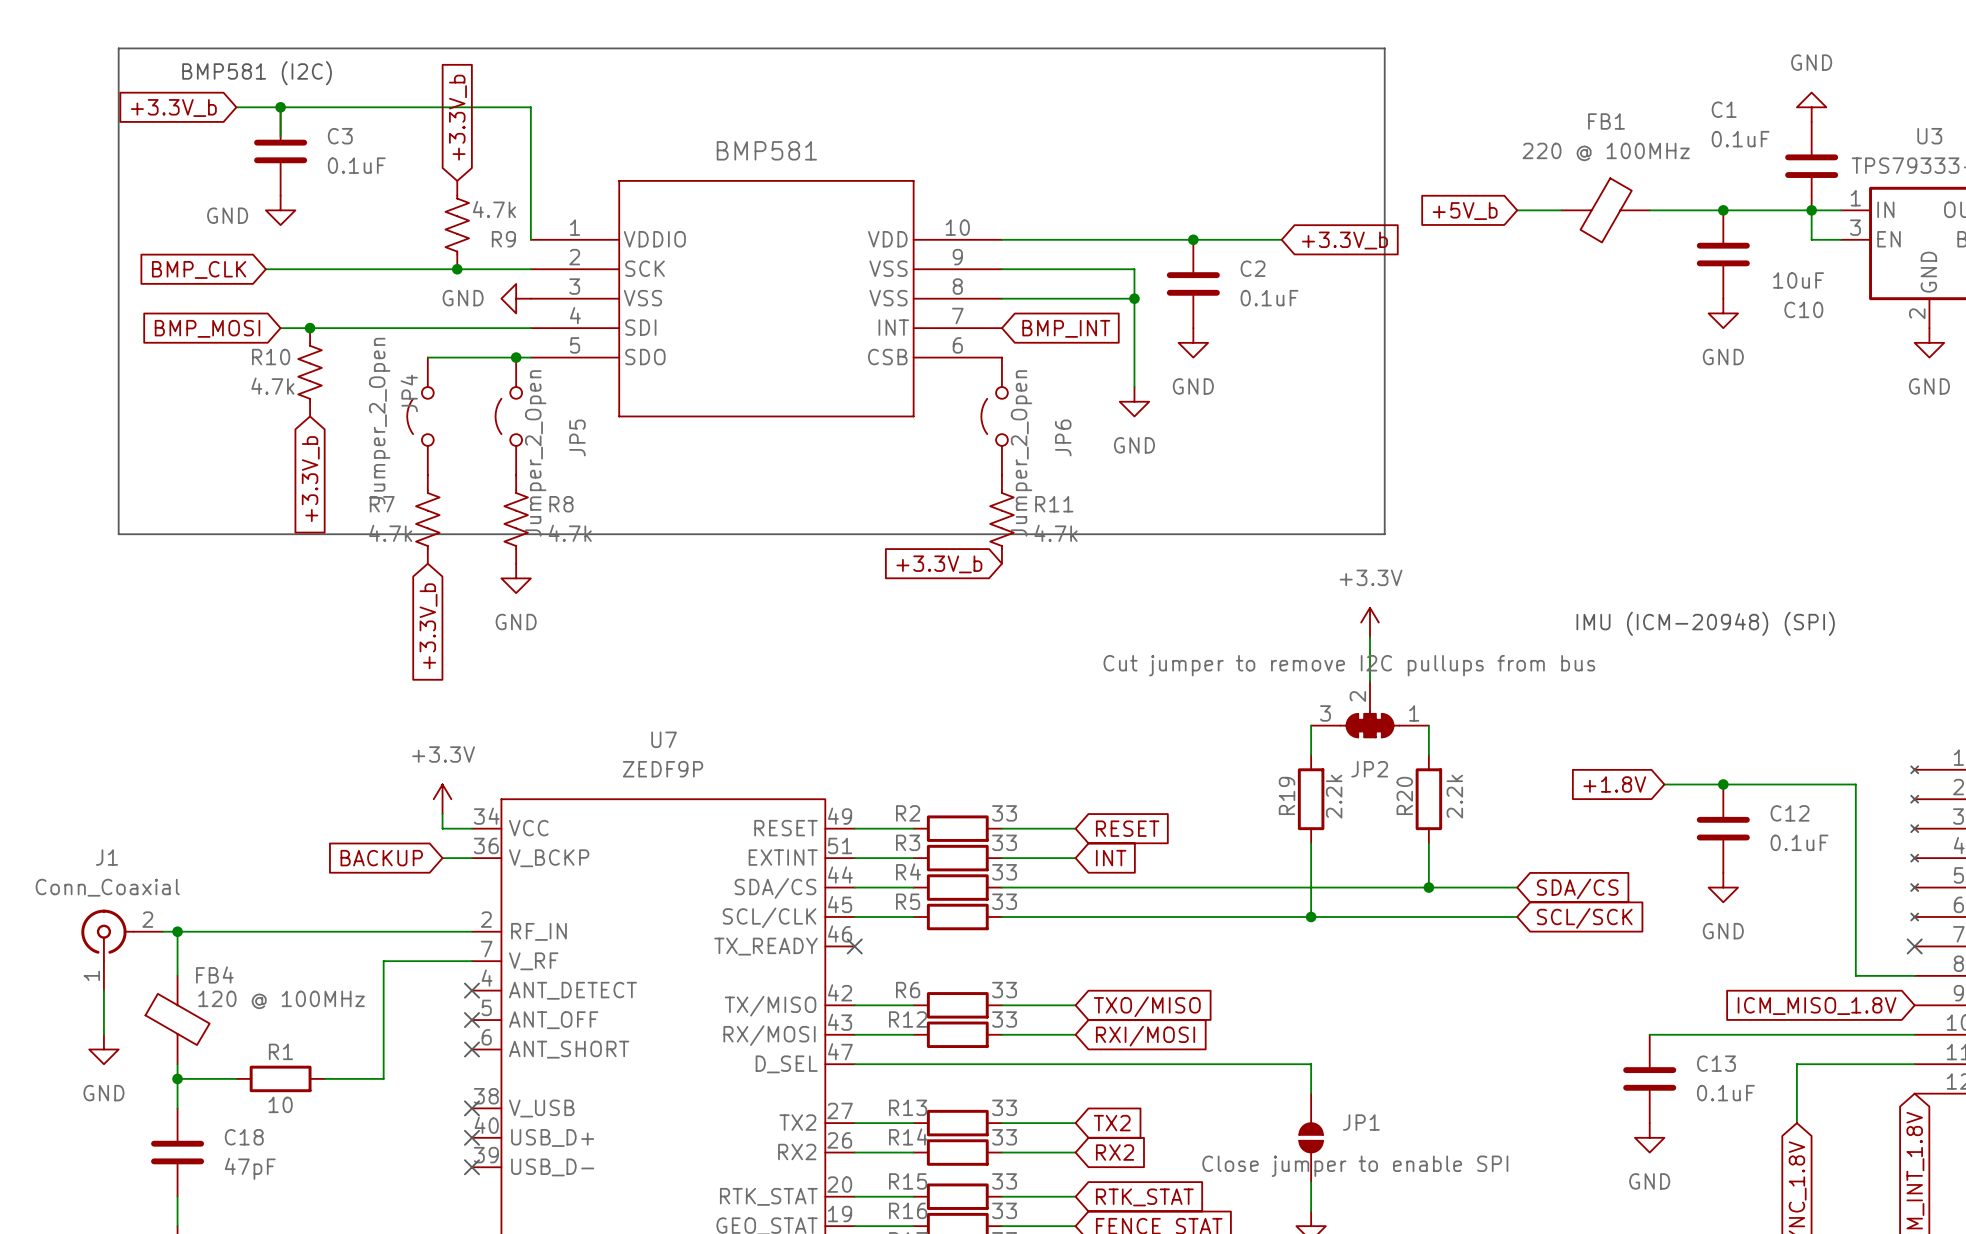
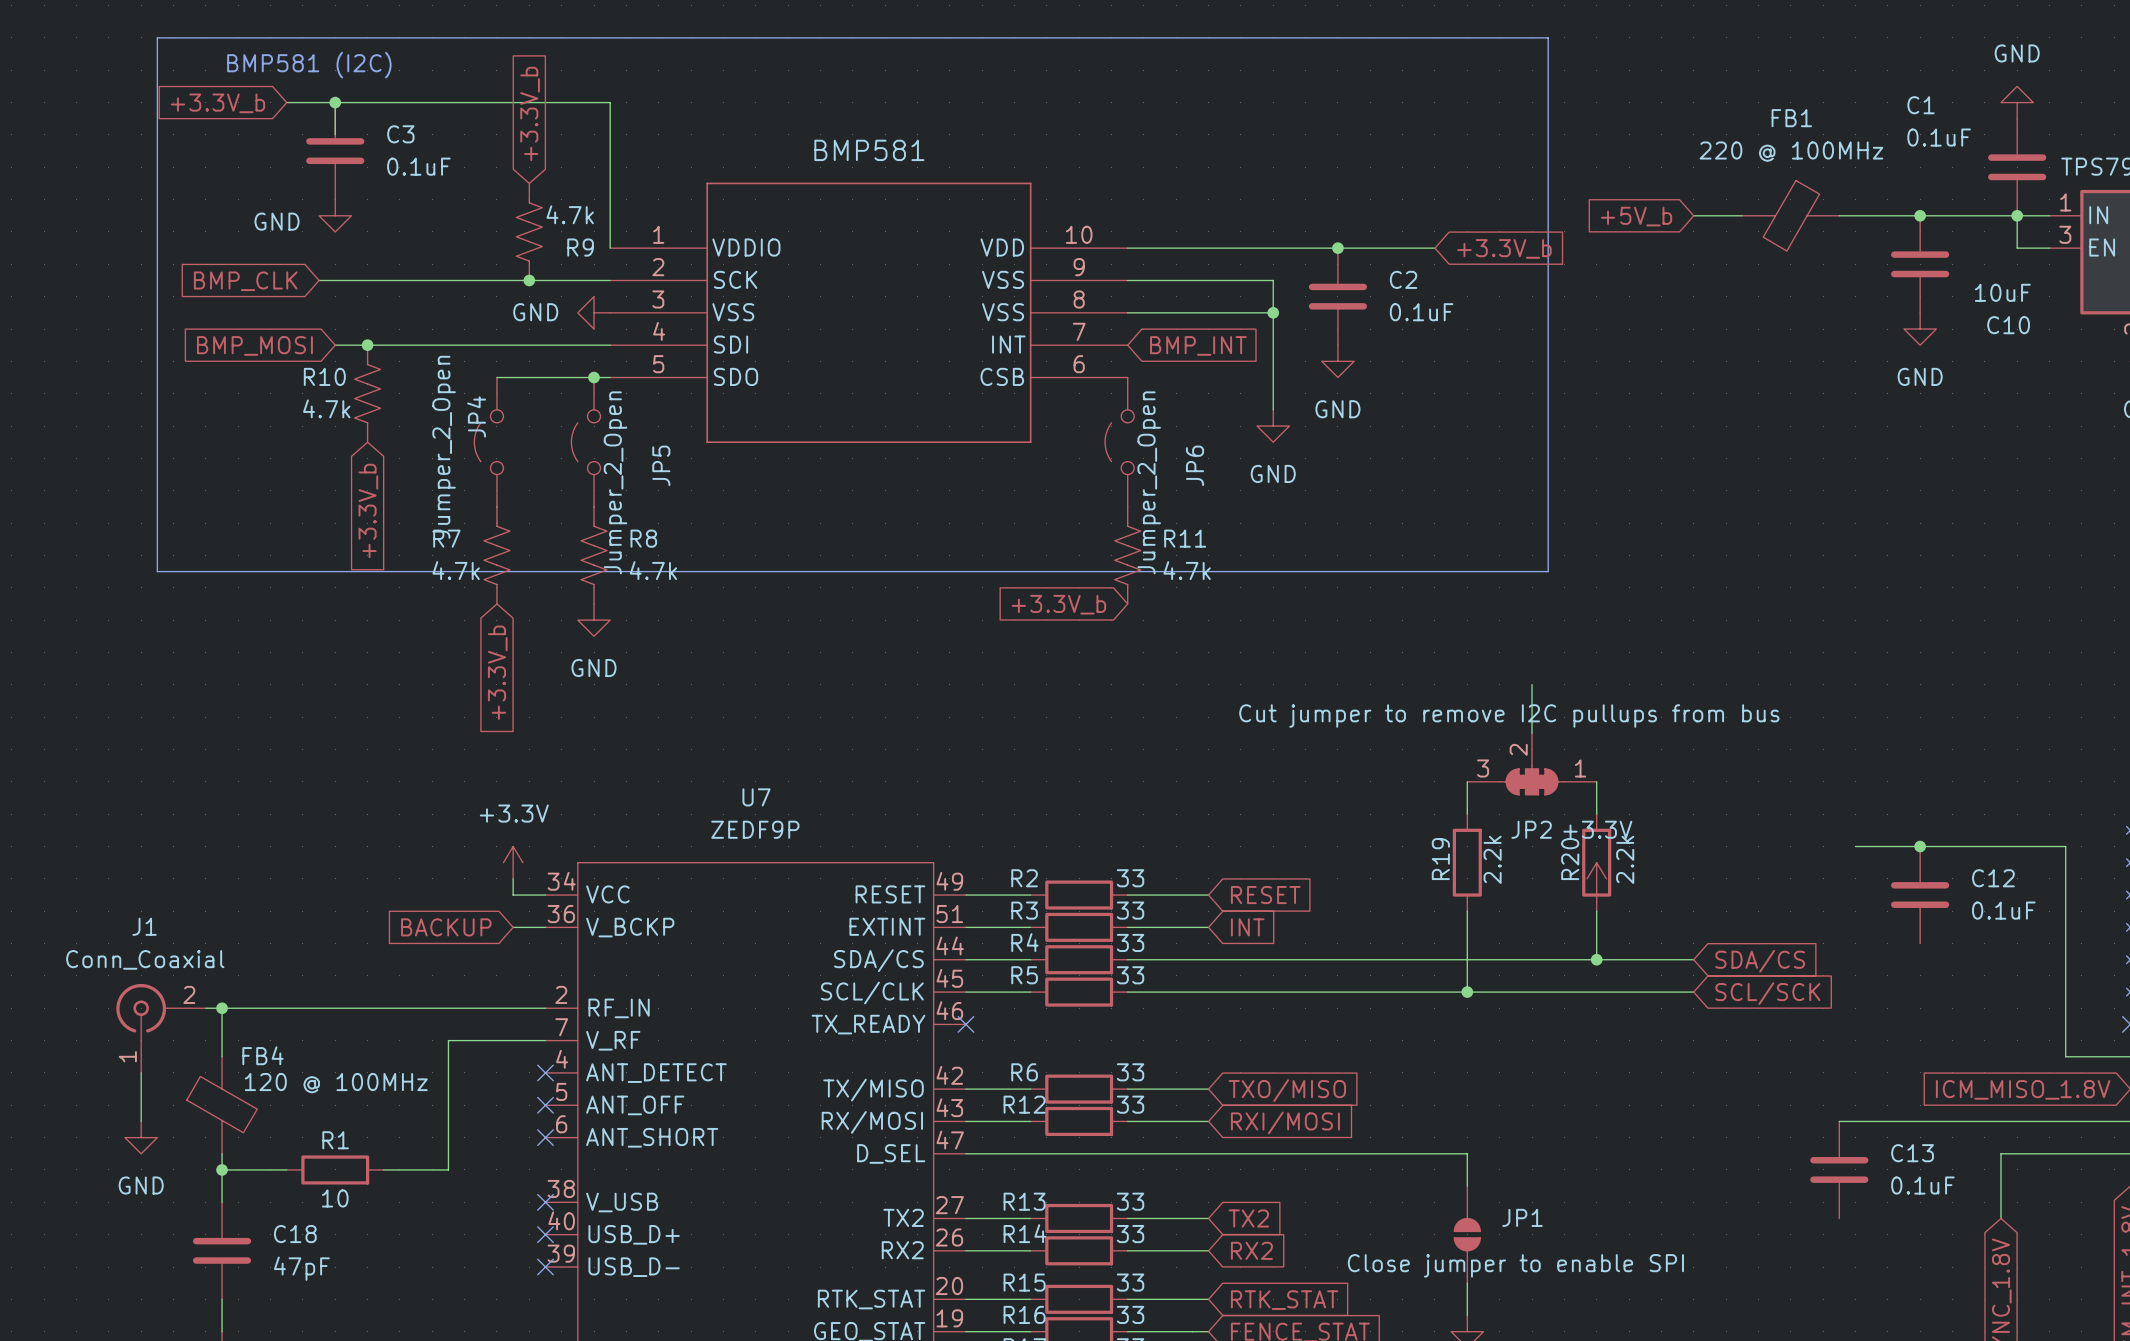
power symbol position: +3.3V (1370, 622) -> +3.3V (1596, 878)
text: IMU (ICM-20948) (SPI) (1705, 623) -> none
global label: +1.8V (1614, 784) -> none
power symbol: GND (1723, 887) -> none
power symbol: GND (1649, 1137) -> none

